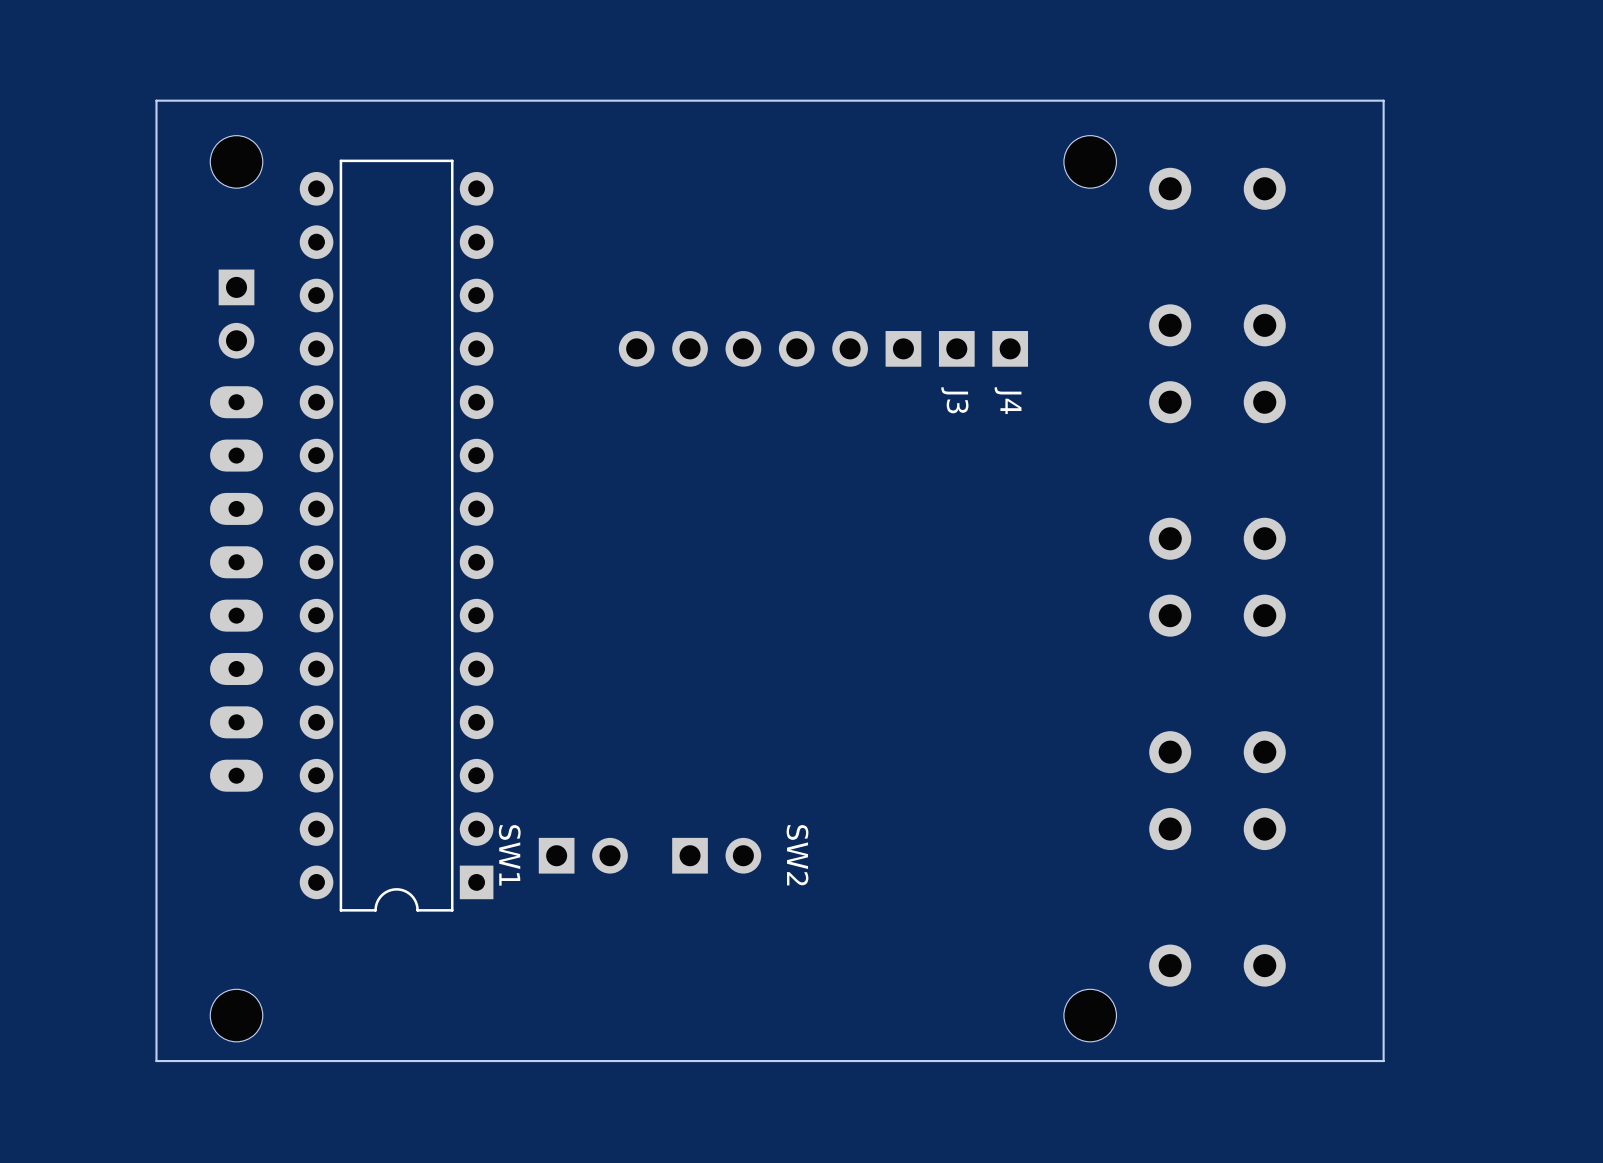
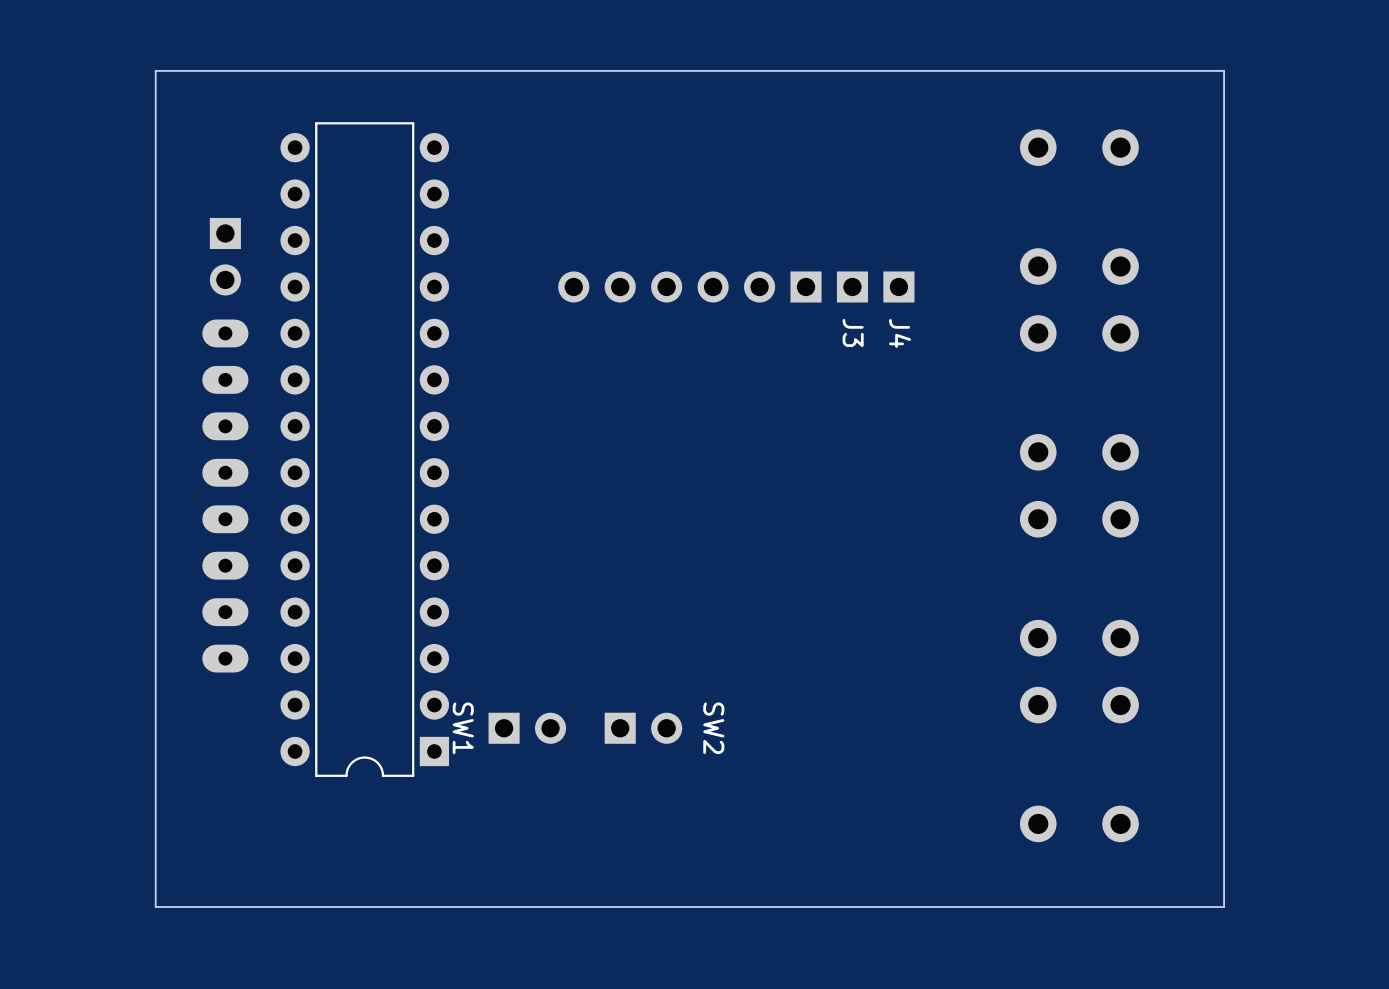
part: (236, 161) -> none
part: (1090, 161) -> none
part: (236, 1015) -> none
part: (1090, 1015) -> none

